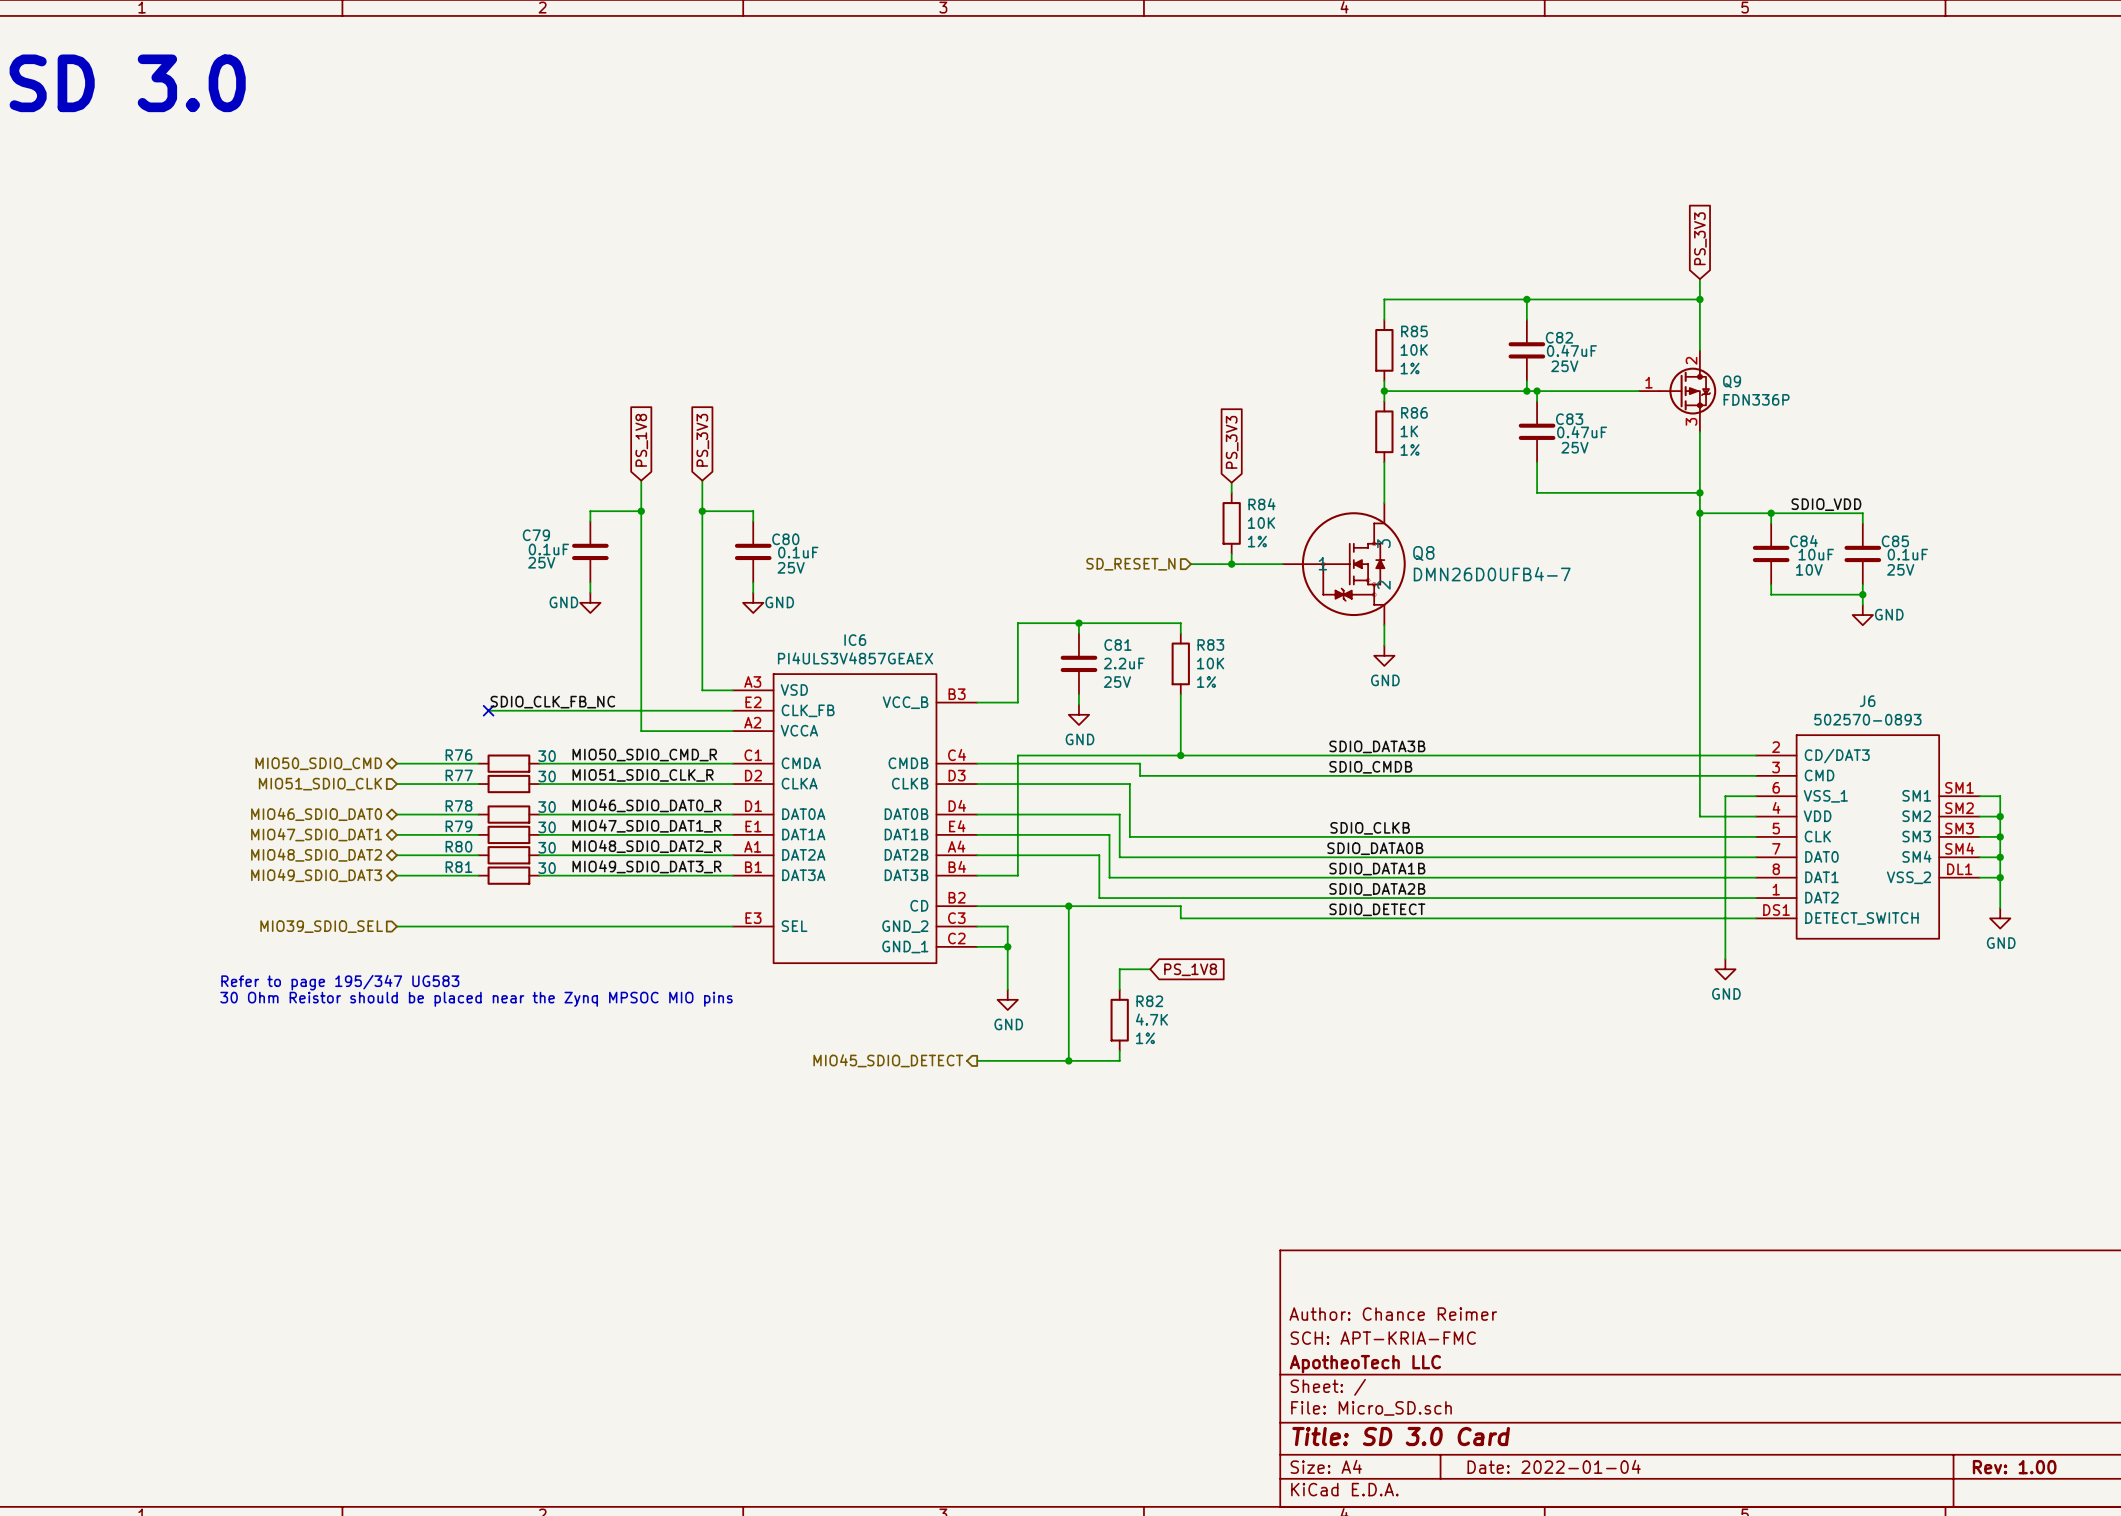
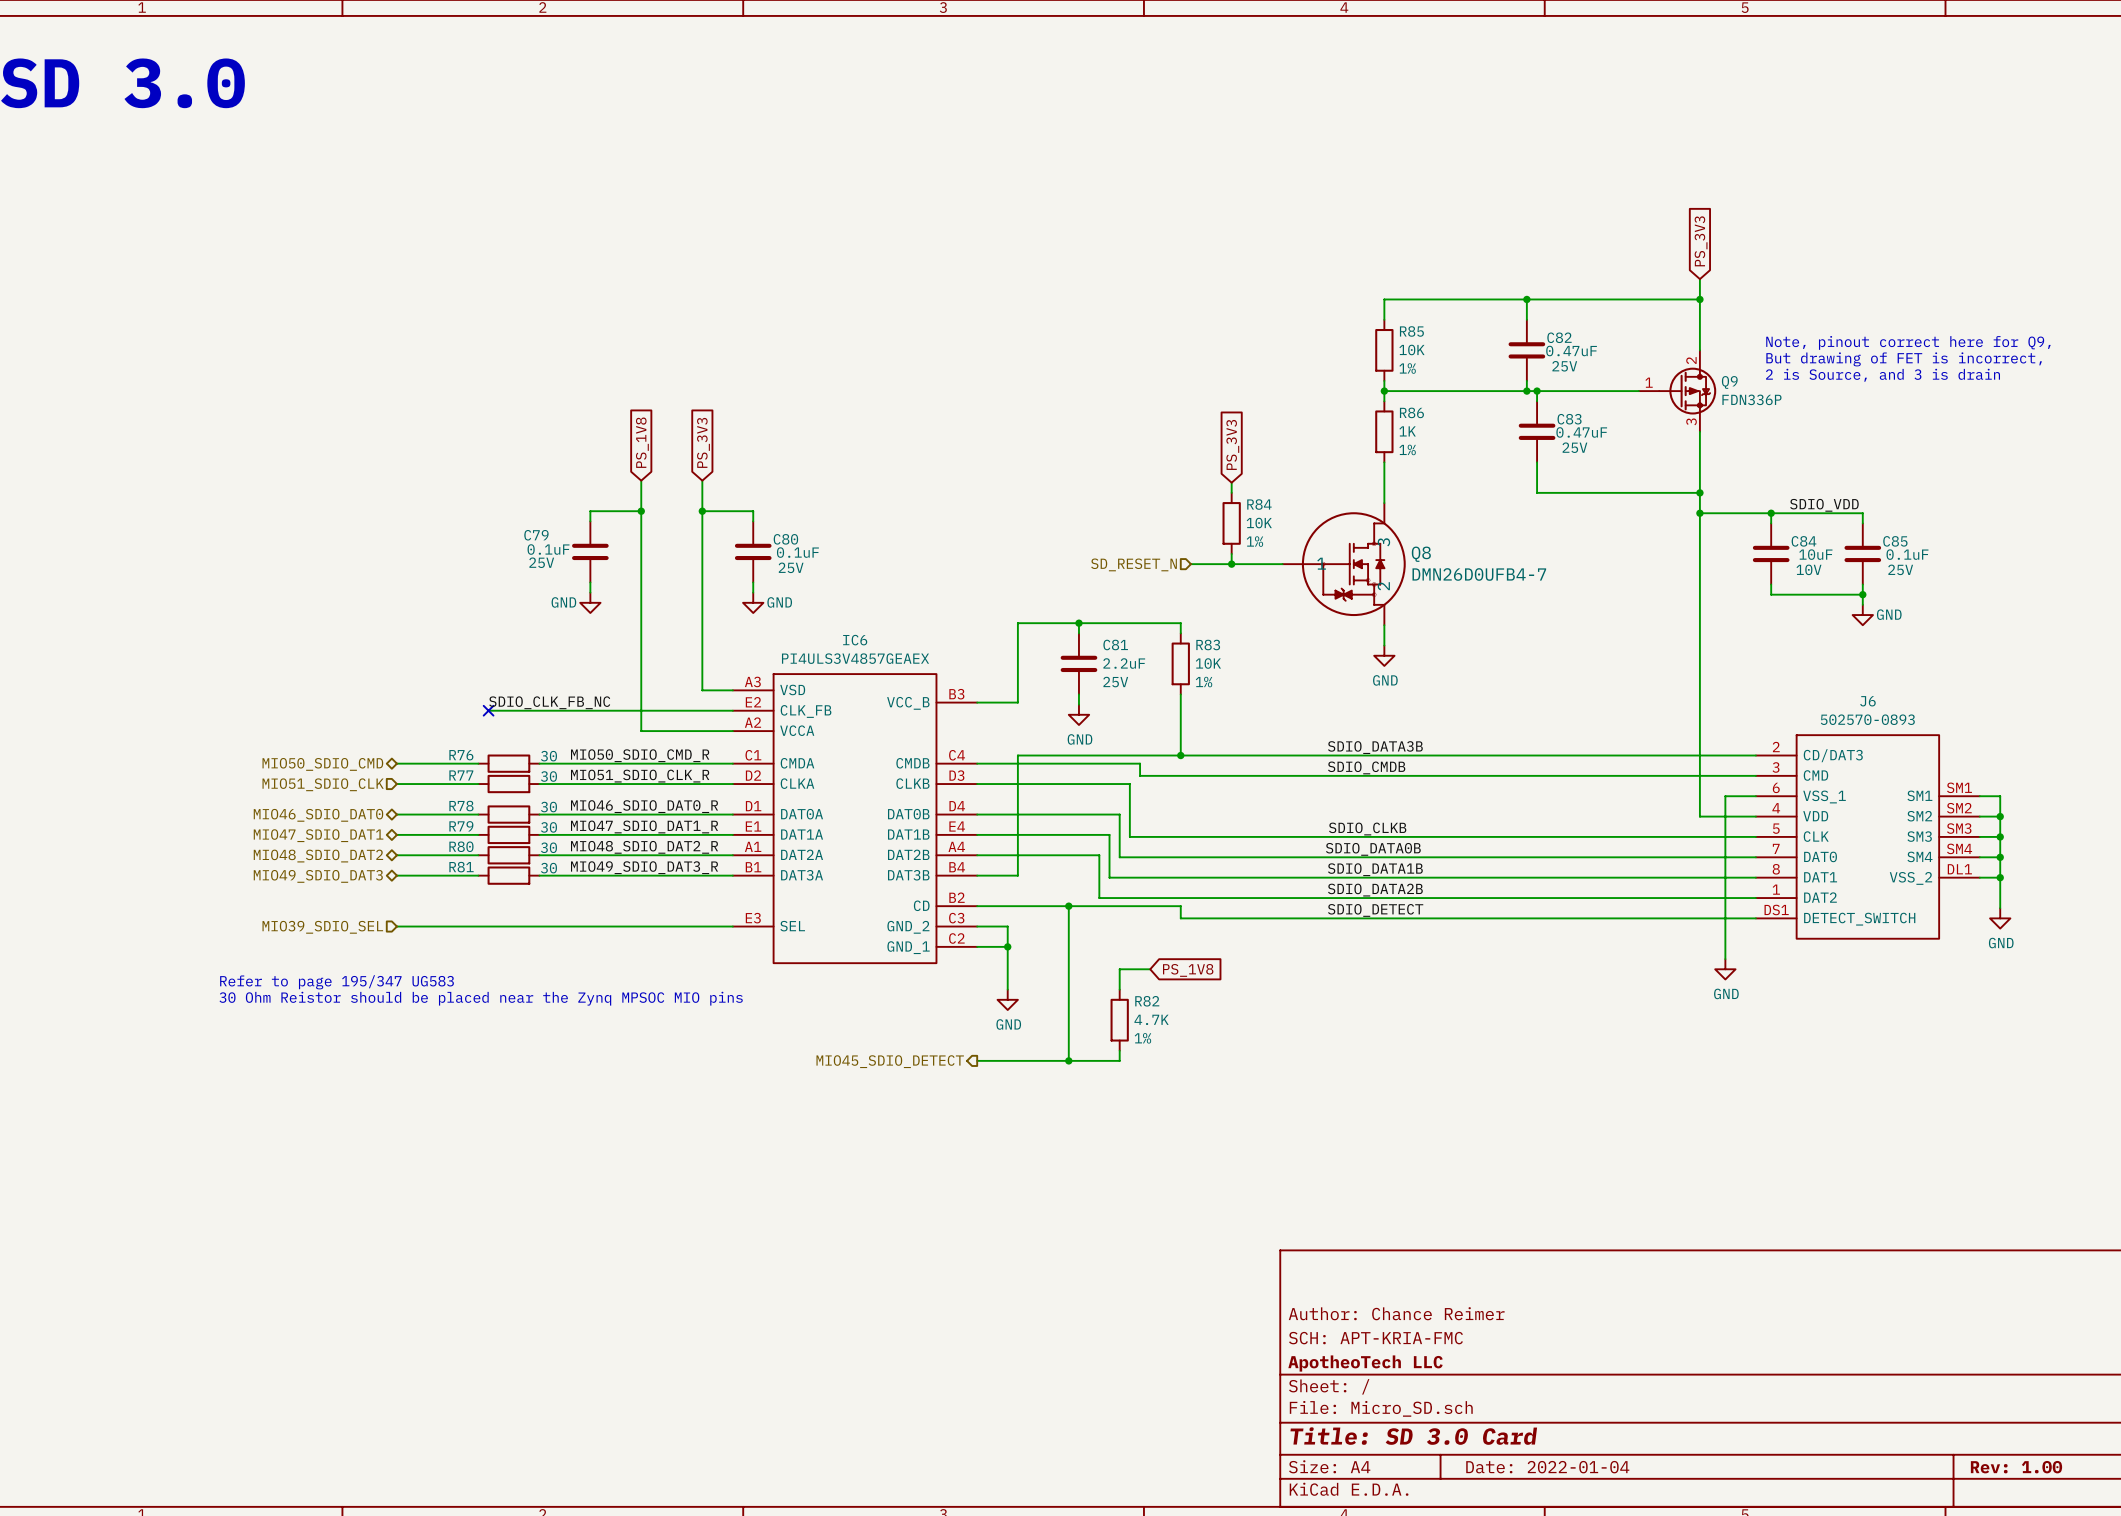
text: none -> Note, pinout correct here for Q9, (1908, 342)
text: none -> But drawing of FET is incorrect, (1904, 359)
text: none -> 2 is Source, and 3 is drain (1883, 375)

